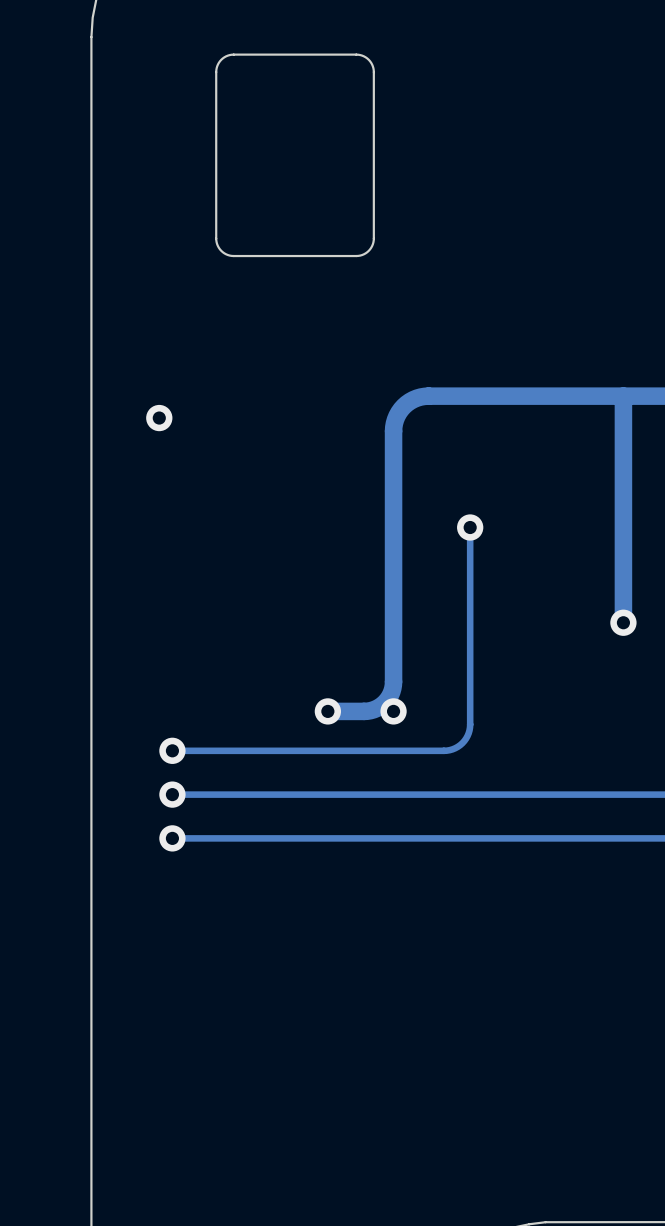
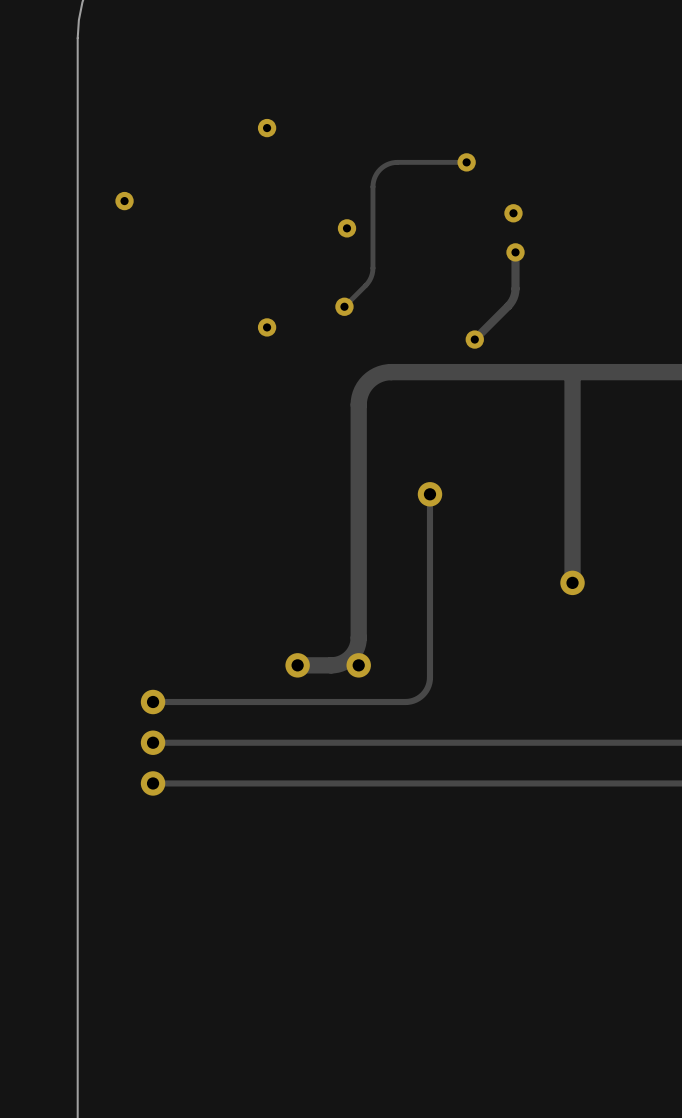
board edge: (356, 54) (231, 54) (224, 57) (218, 62) (216, 72) (216, 238) (218, 247) (224, 253) (233, 256) (356, 256) (363, 254) (371, 247) (373, 238) (373, 70) (367, 58) (356, 54) -> none
via: none -> (267, 128)
track: none -> (466, 162) (394, 162) (384, 166) (378, 171) (373, 184) (372, 274) (367, 283) (344, 306)
via: none -> (466, 162)
via: none -> (124, 201)
via: none -> (513, 213)
via: none -> (347, 228)
track: none -> (515, 252) (513, 298) (508, 305) (474, 339)
via: none -> (515, 252)
via: none -> (344, 306)
via: none -> (267, 327)
via: none -> (474, 339)
via: (159, 418) -> none

